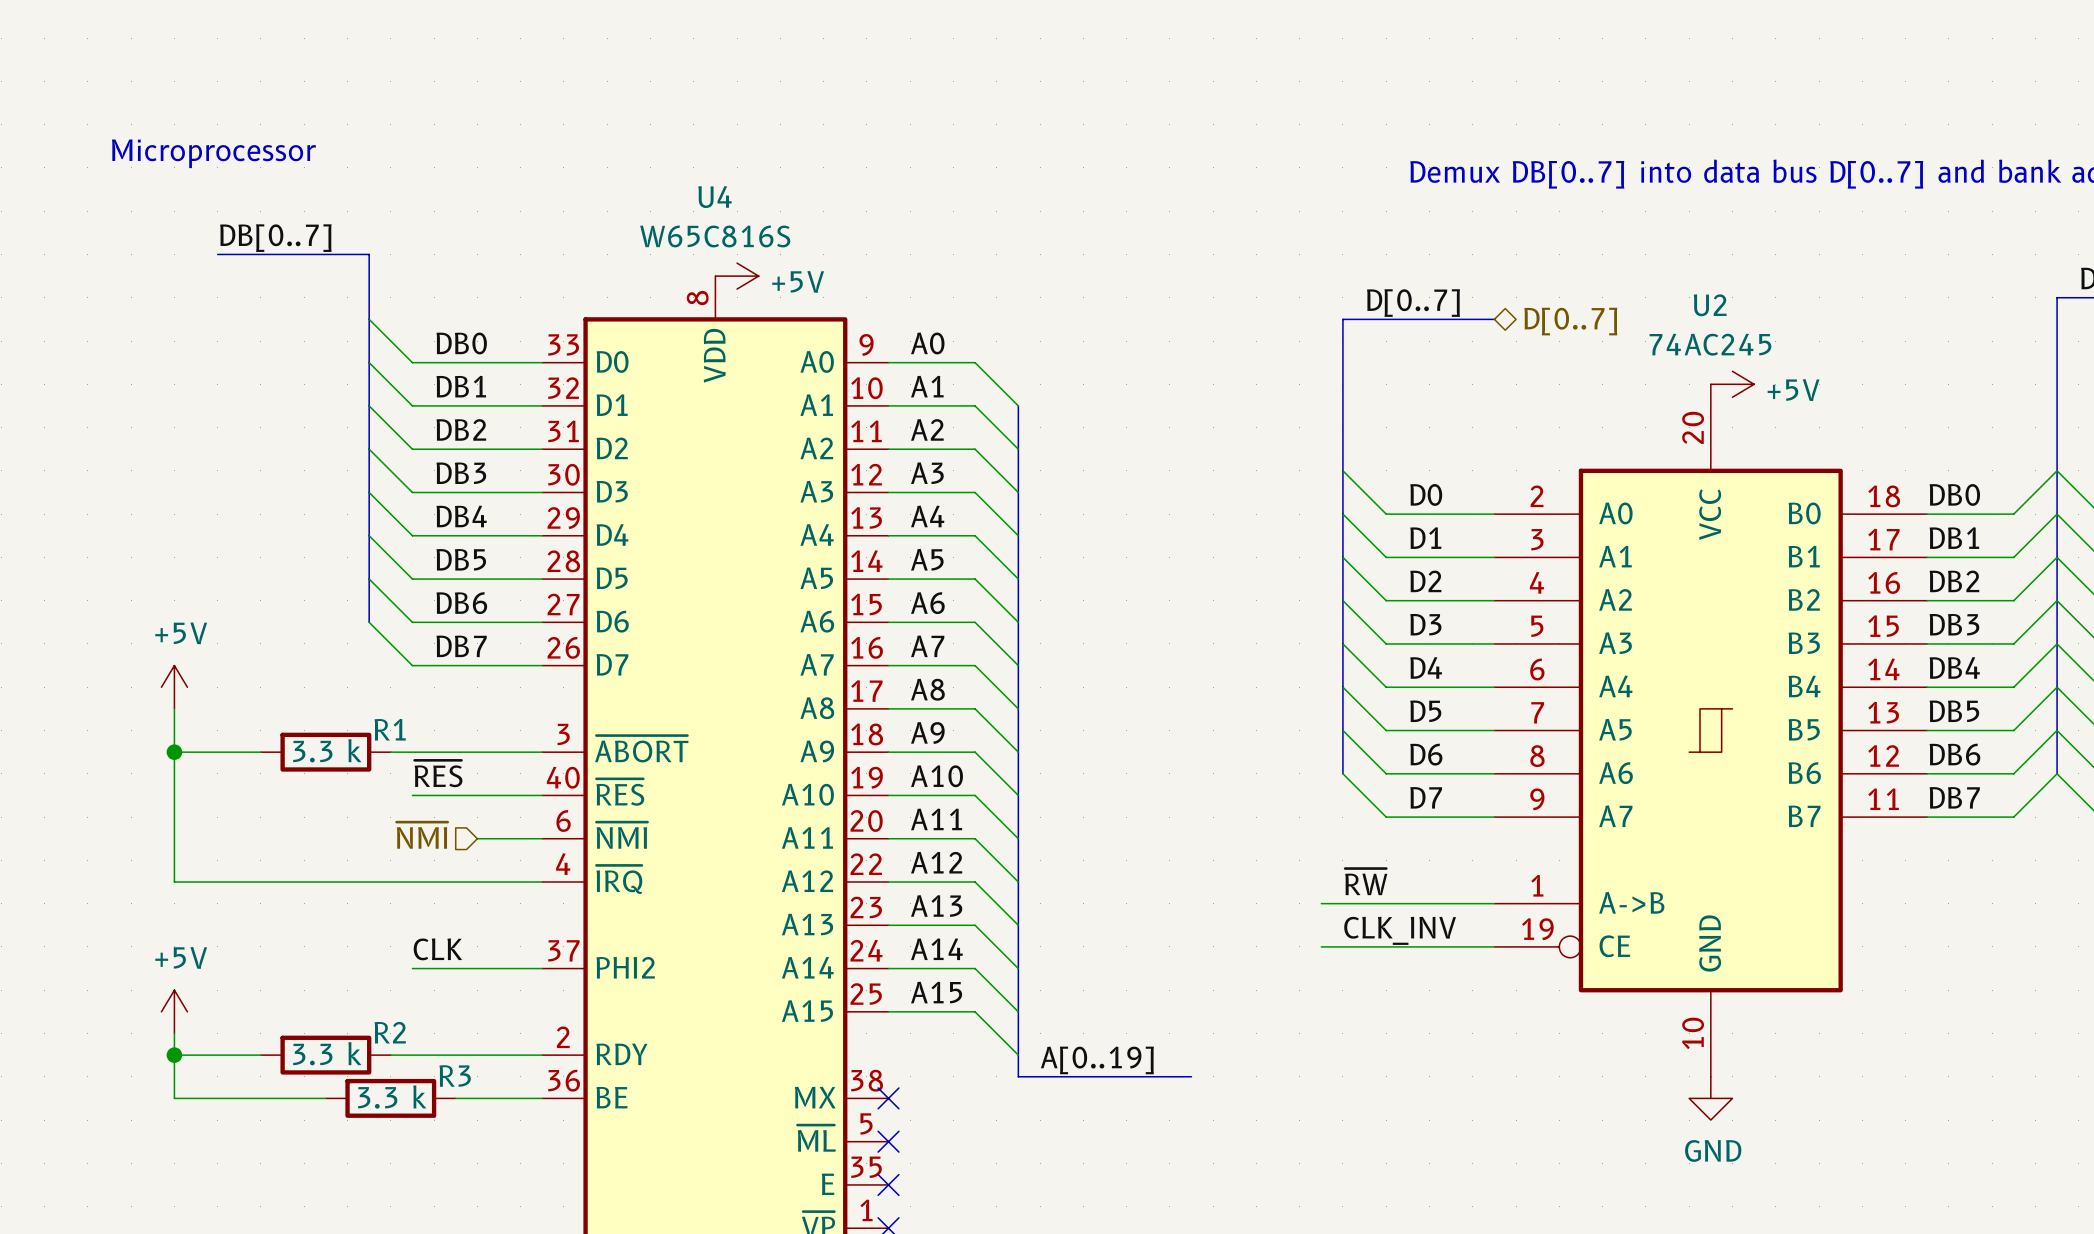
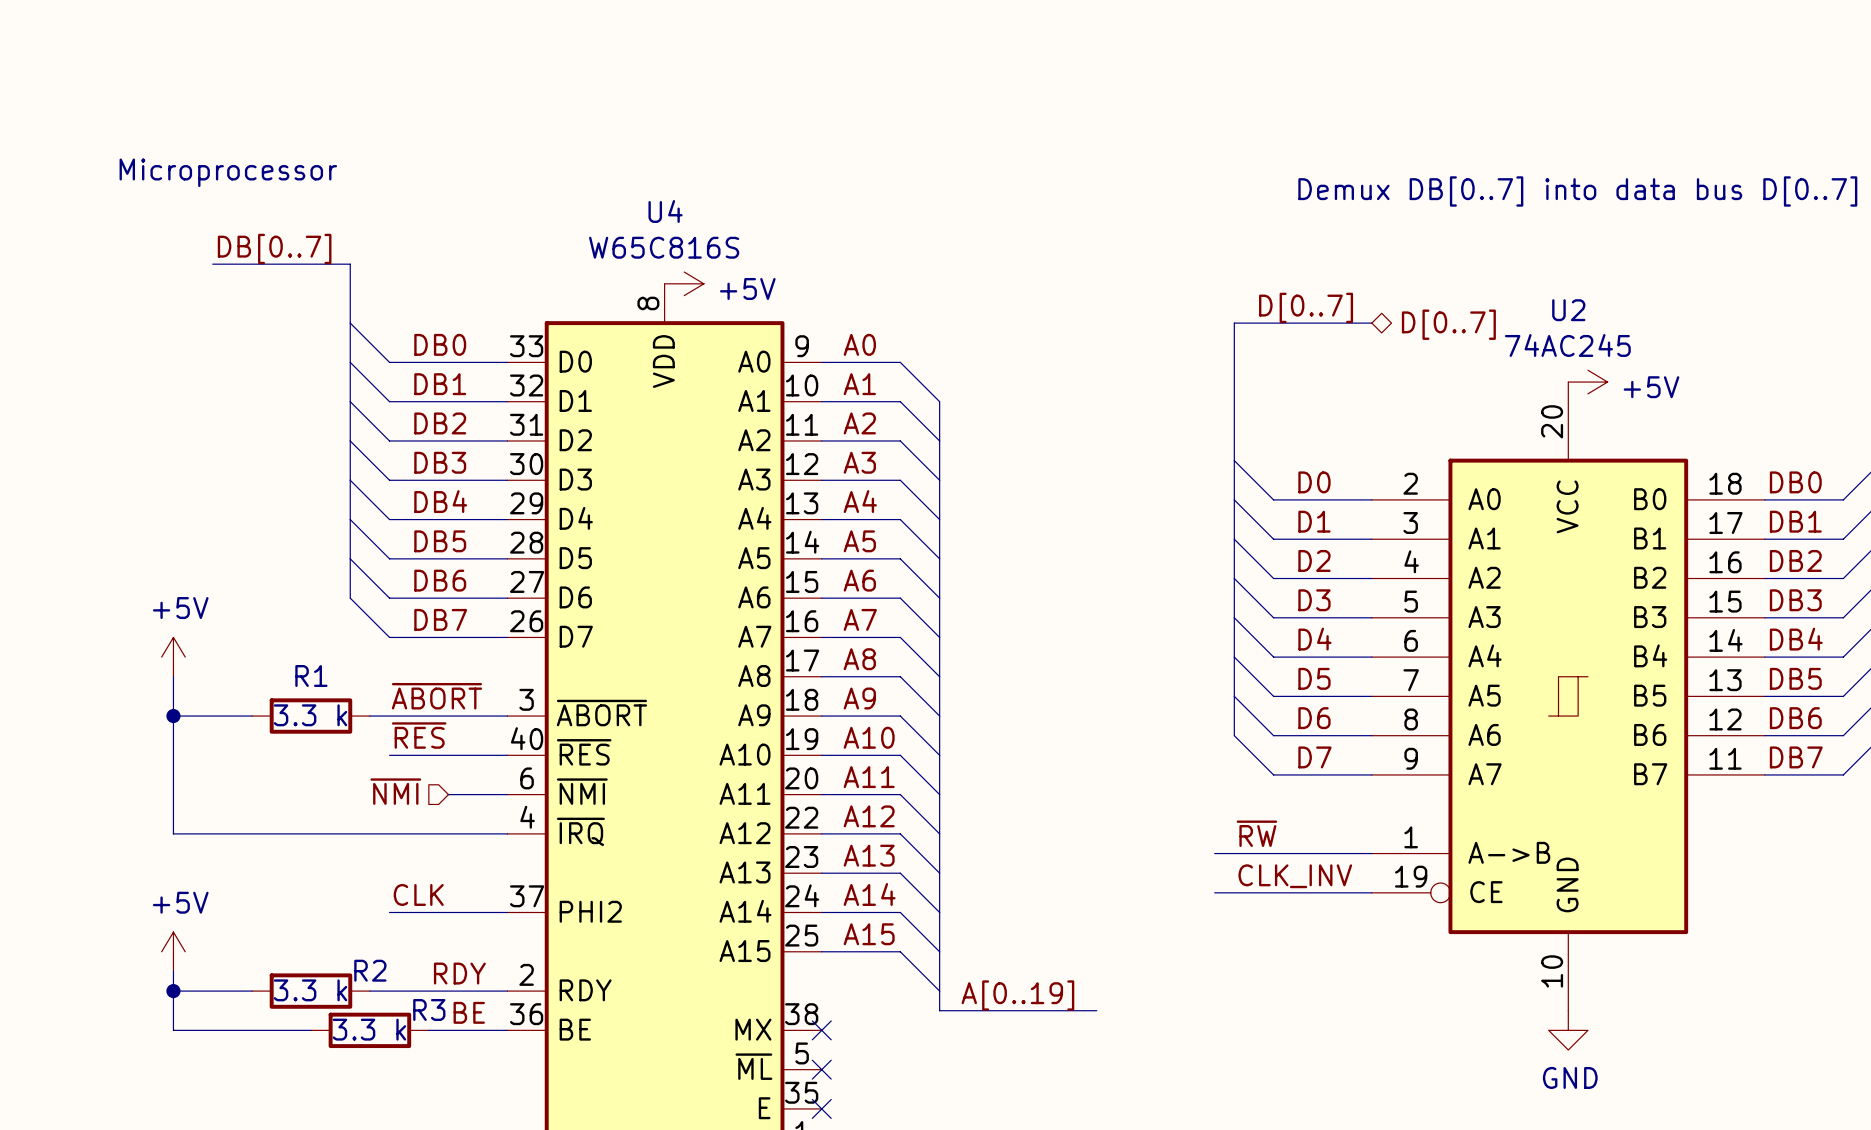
R1 name position: R1 (390, 729) -> R1 (311, 676)
label: none -> ~{ABORT} (436, 696)
label: none -> RDY (459, 973)
label: none -> BE (469, 1012)

